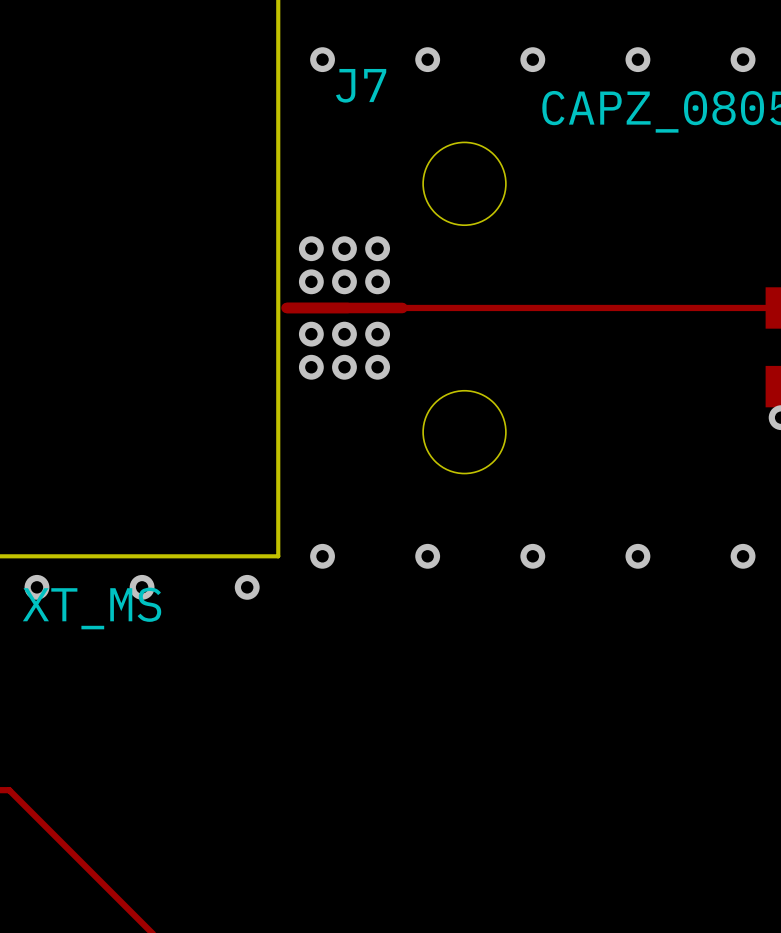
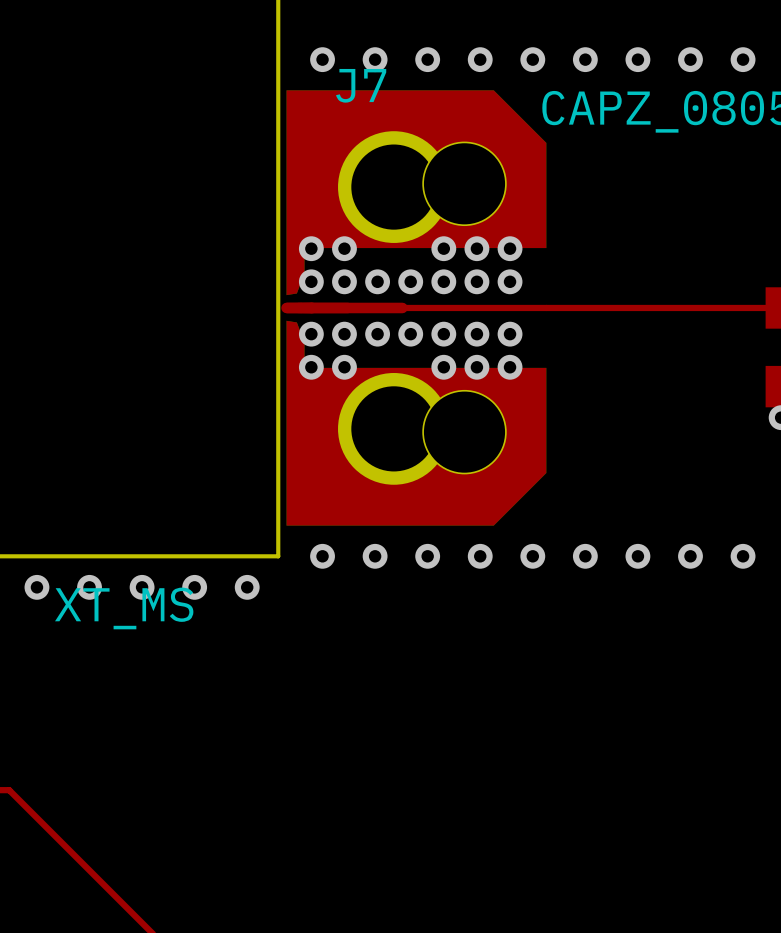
via: none -> (375, 59)
via: none -> (480, 59)
via: none -> (585, 59)
via: none -> (690, 59)
via: (377, 248) -> none
via: none -> (443, 248)
via: none -> (476, 248)
via: none -> (510, 248)
via: none -> (410, 281)
via: none -> (443, 281)
via: none -> (476, 281)
via: none -> (510, 281)
part: none -> (416, 307)
via: none -> (410, 334)
via: none -> (443, 334)
via: none -> (476, 334)
via: none -> (510, 334)
via: (377, 367) -> none
via: none -> (443, 367)
via: none -> (476, 367)
via: none -> (510, 367)
via: none -> (375, 556)
via: none -> (480, 556)
via: none -> (585, 556)
via: none -> (690, 556)
via: none -> (89, 587)
via: none -> (194, 587)
text position: XT_MS (92, 608) -> XT_MS (124, 608)

